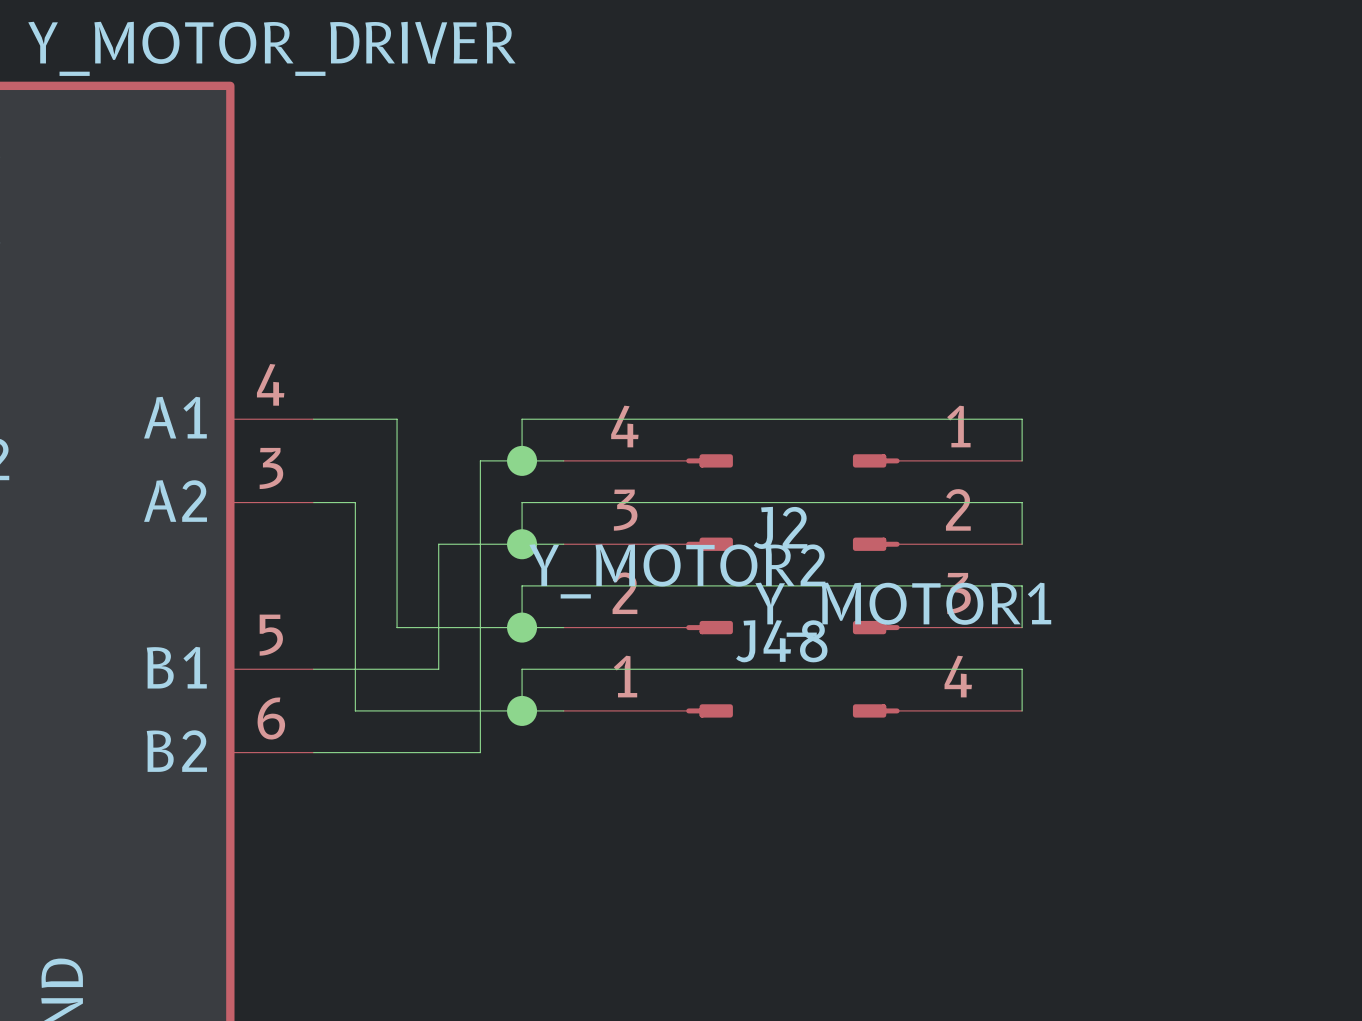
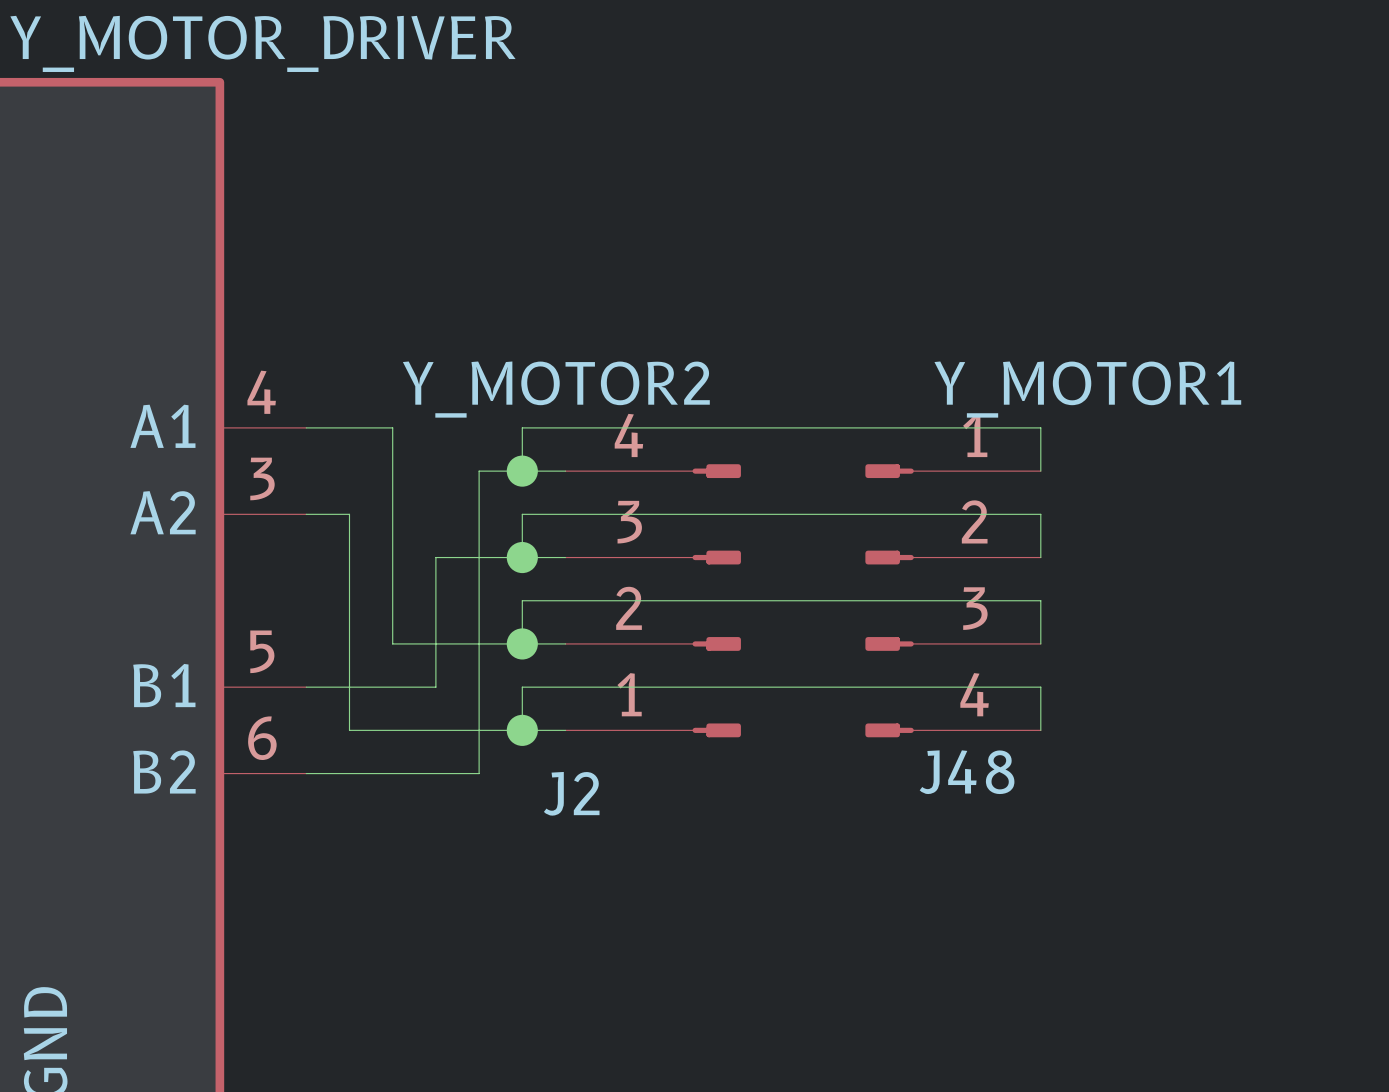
J2 name position: J2 (780, 527) -> J2 (571, 793)
J48 value position: Y_MOTOR2 (677, 571) -> Y_MOTOR2 (556, 389)
J2 value position: Y_MOTOR1 (903, 609) -> Y_MOTOR1 (1087, 389)
J48 name position: J48 (781, 641) -> J48 (967, 772)

